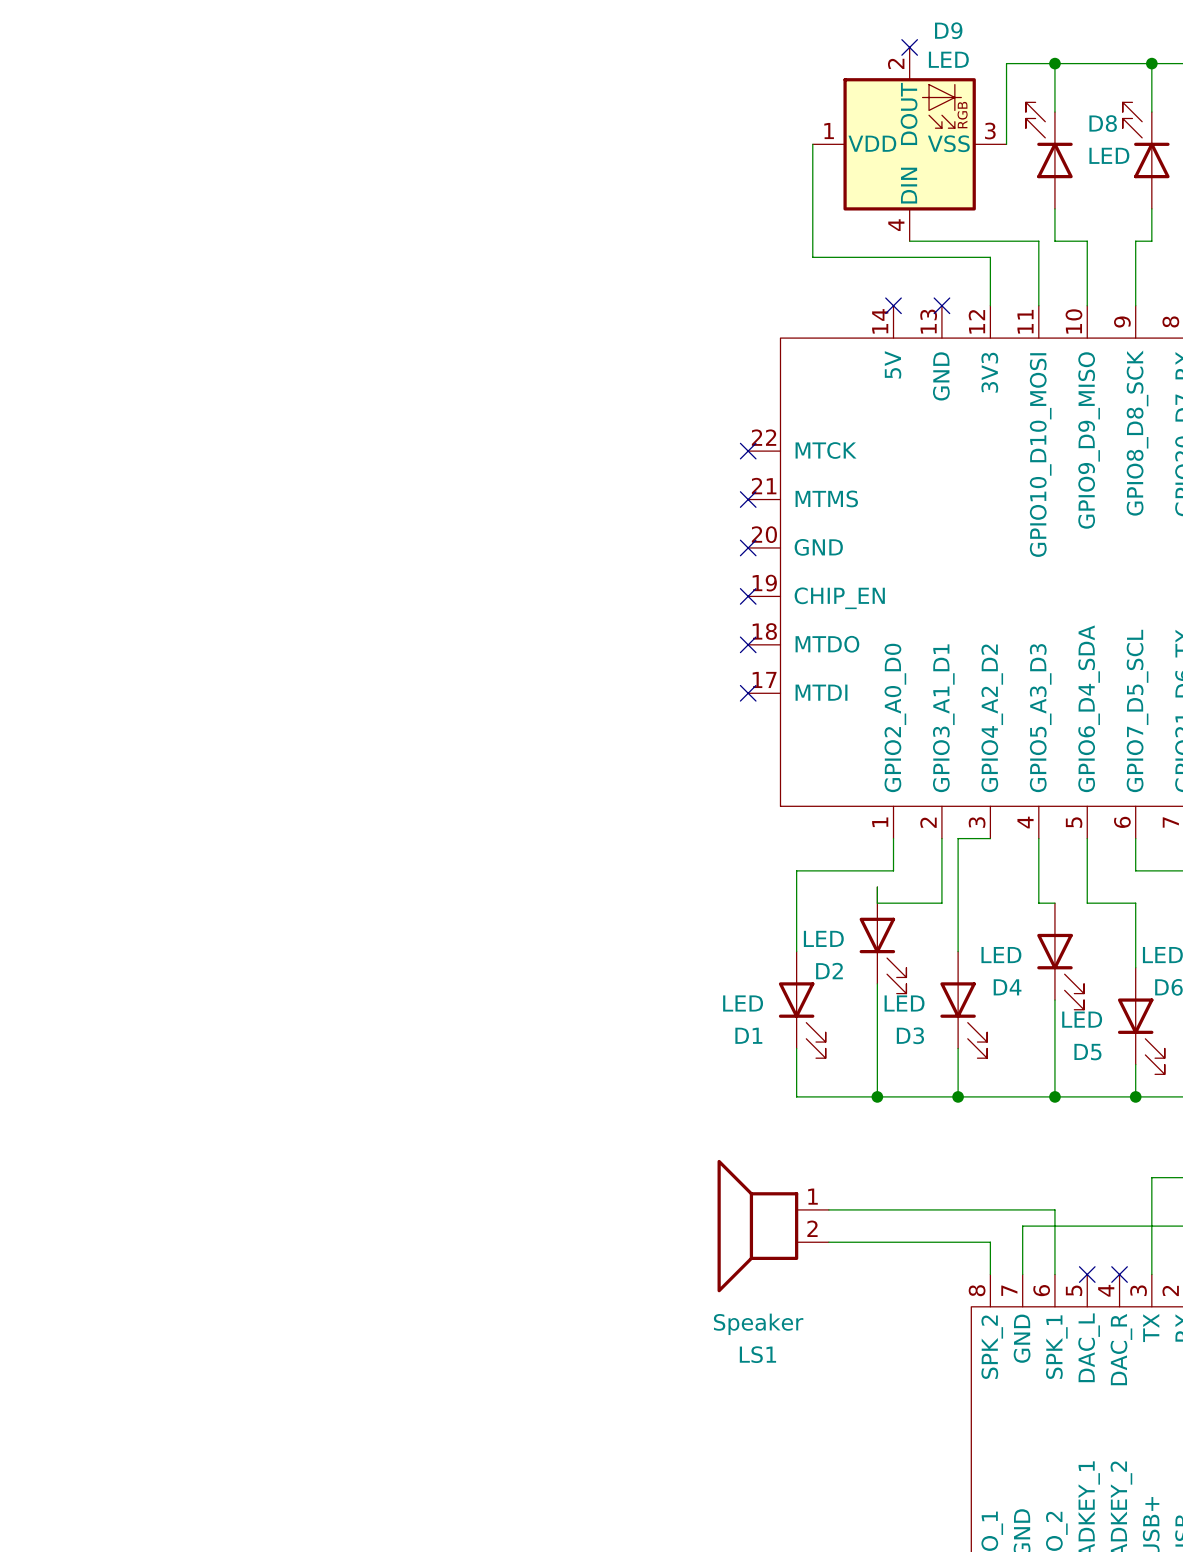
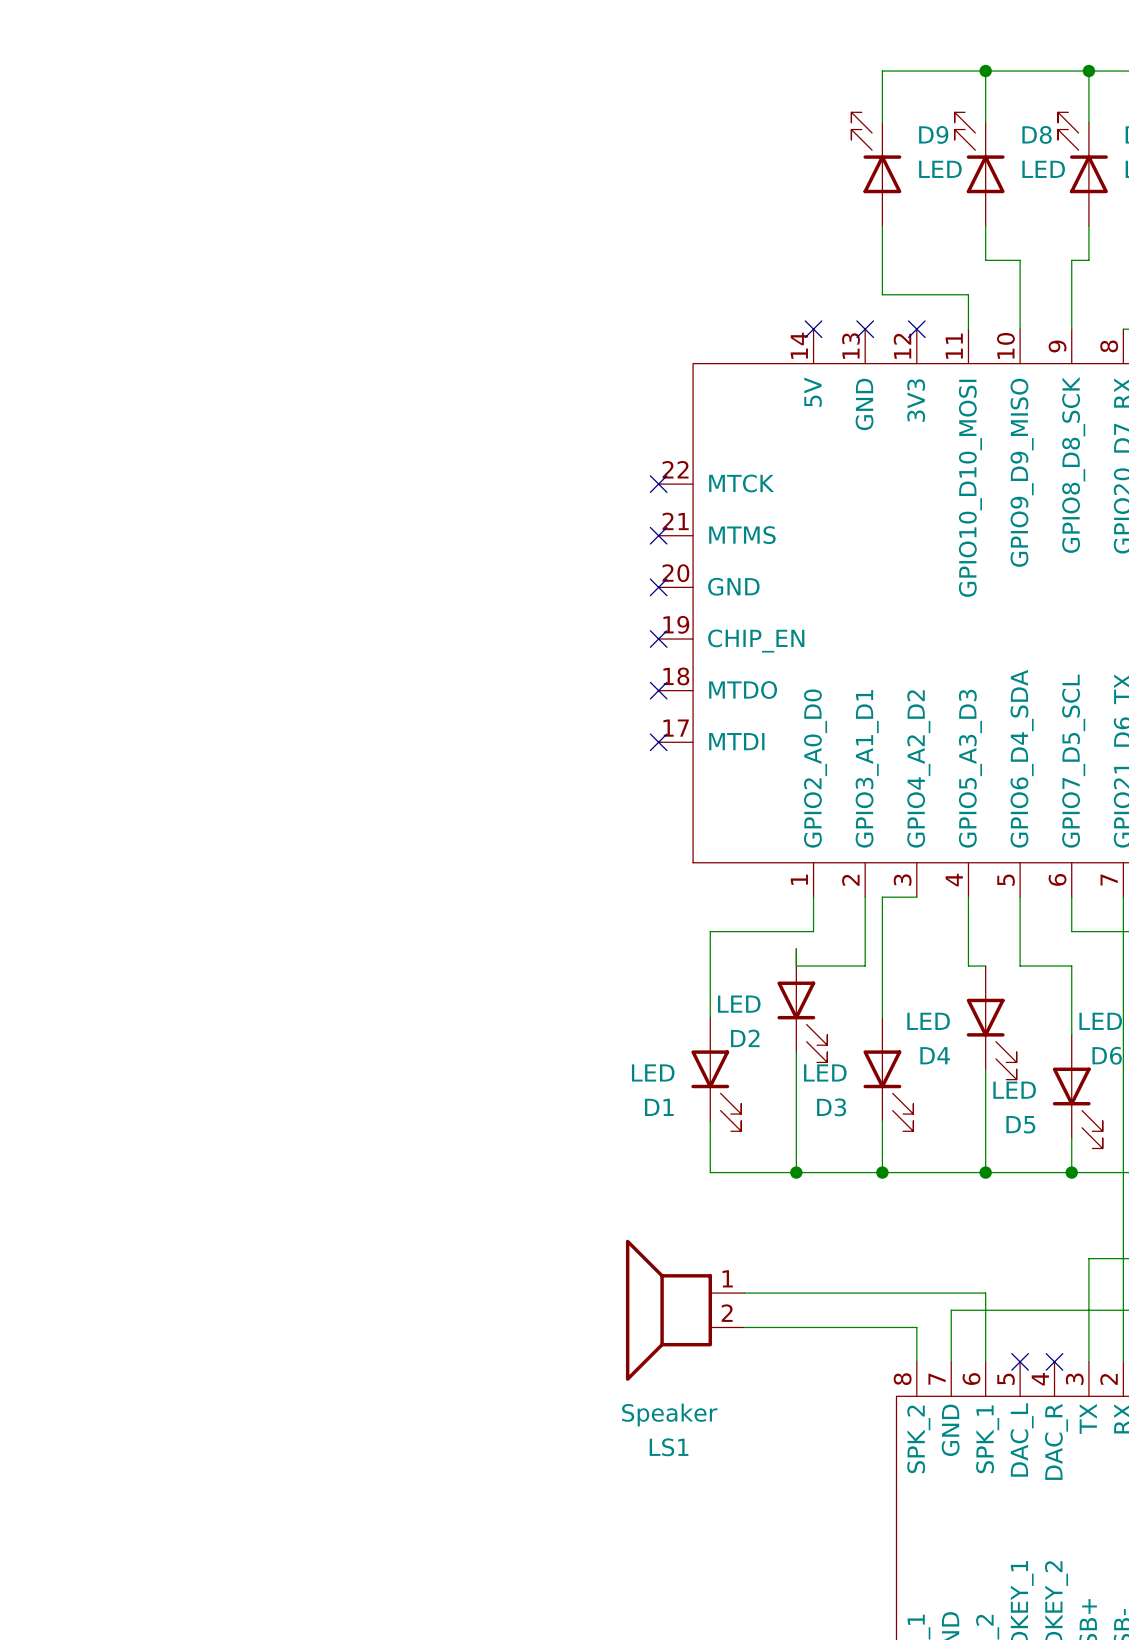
D9 name position: D9 (948, 30) -> D9 (933, 134)
D9 symbol: [812, 47, 1007, 242] -> [851, 112, 902, 226]
no-connect mark: (909, 47) -> none
D9 value position: LED (948, 59) -> LED (940, 169)
wire: (1006, 63) (1006, 144) -> (934, 71) (882, 71) (882, 122)
wire: (812, 144) (812, 257) (990, 257) (990, 305) -> none
wire: (909, 241) (1038, 241) (1038, 273) -> (882, 225) (882, 294) (968, 294)
no-connect mark: none -> (916, 329)

